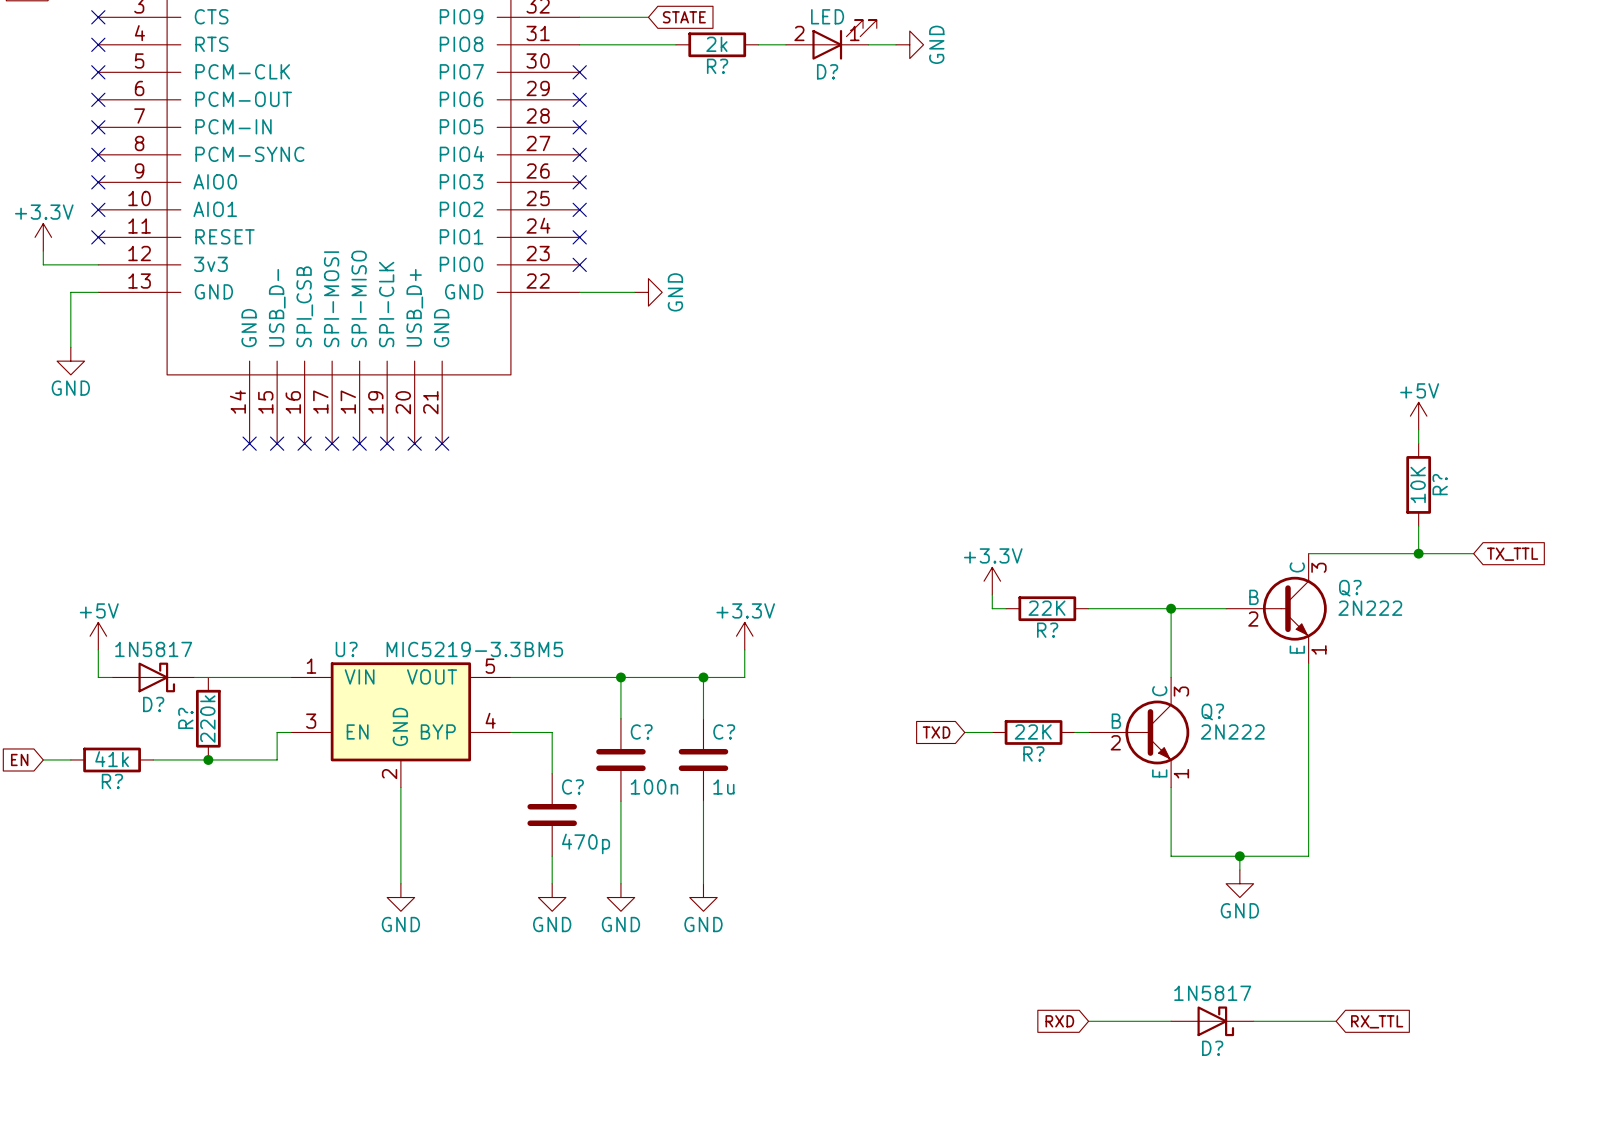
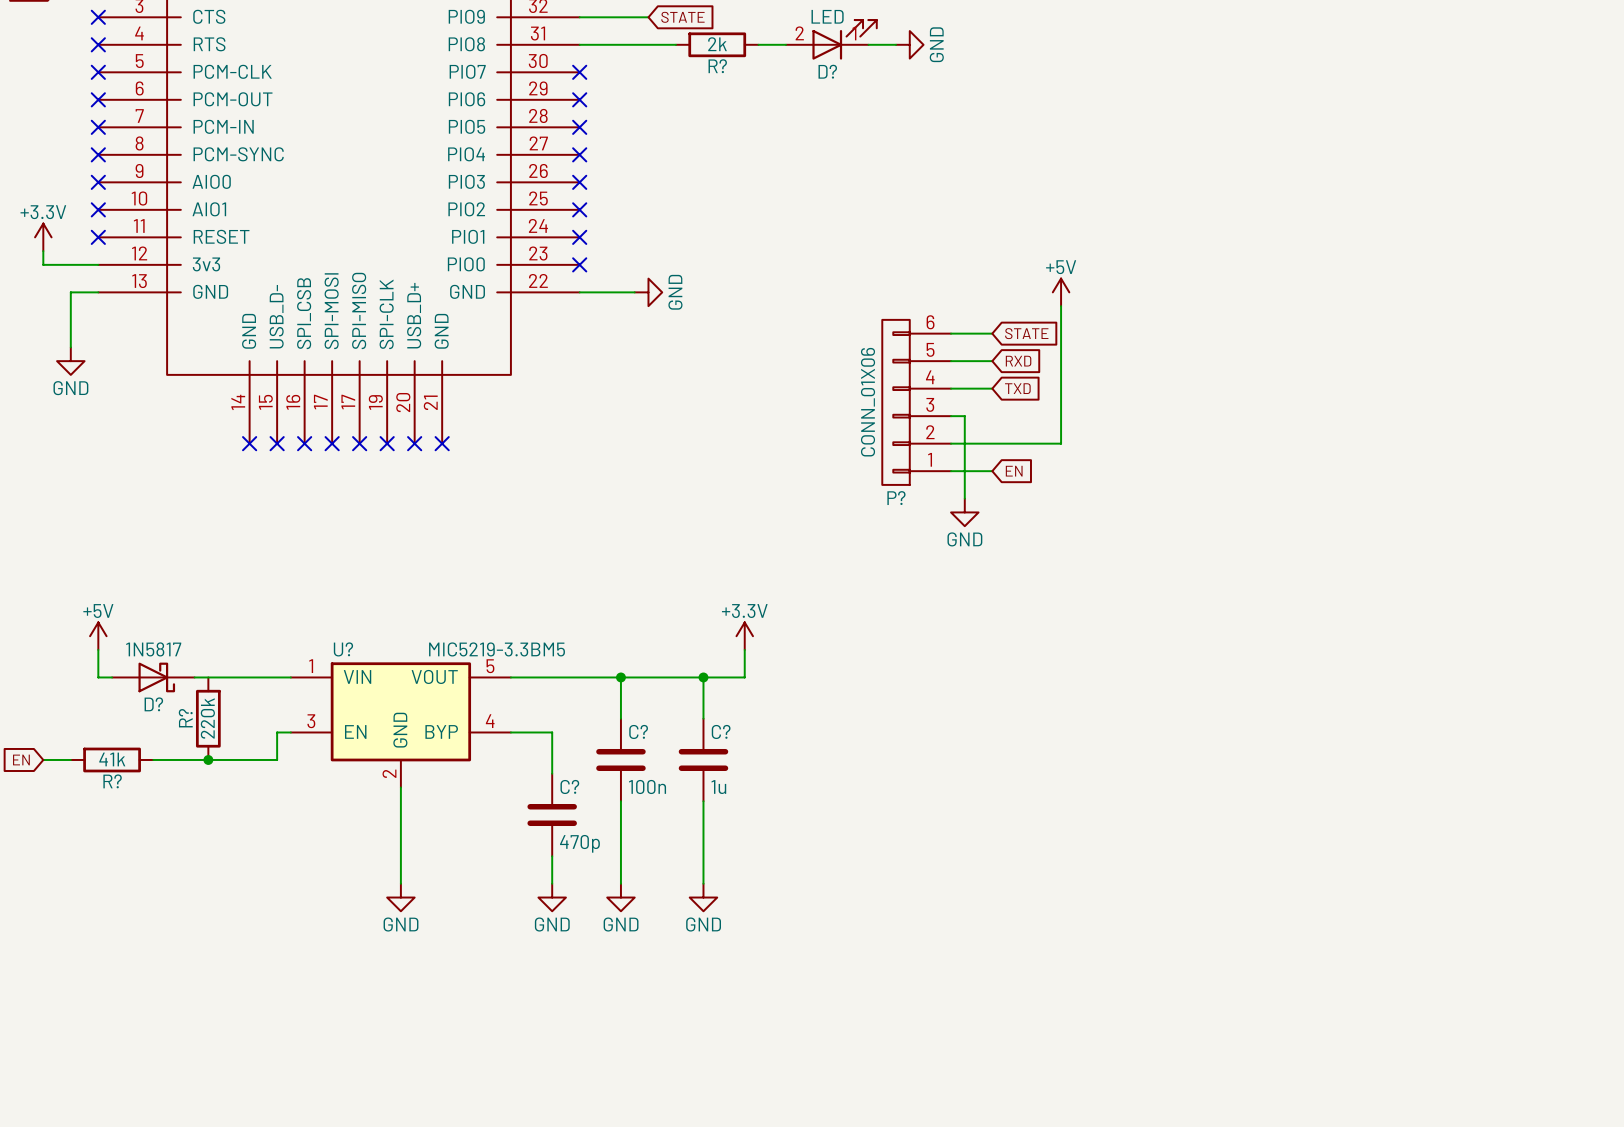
power symbol: none -> +5V (1061, 292)
wire: none -> (1061, 306) (1061, 443) (951, 443)
wire: none -> (951, 333) (992, 333)
global label: none -> STATE (1026, 333)
wire: none -> (951, 361) (992, 361)
global label: none -> RXD (1018, 361)
wire: none -> (951, 388) (992, 388)
global label: none -> TXD (1017, 388)
P?: none -> CONN_01X06 (916, 402)
wire: none -> (951, 416) (964, 416) (964, 498)
power symbol: +5V (1418, 416) -> none
wire: (1418, 429) (1418, 443) -> none
wire: none -> (951, 471) (992, 471)
global label: none -> EN (1014, 471)
R?: 10K (1418, 484) -> none
power symbol: none -> GND (964, 512)
wire: (1418, 526) (1418, 553) -> none
wire: (1308, 553) (1473, 553) -> none
junction: (1418, 553) -> none
global label: TX_TTL (1512, 554) -> none
power symbol: +3.3V (992, 581) -> none
wire: (992, 594) (992, 608) (1006, 608) -> none
R?: 22K (1047, 608) -> none
wire: (1088, 608) (1226, 608) -> none
wire: (1171, 608) (1171, 677) -> none
junction: (1171, 608) -> none
Q?: 2N222 (1276, 608) -> none
wire: (1308, 663) (1308, 856) (1171, 856) (1171, 787) -> none
global label: TXD (936, 732) -> none
wire: (964, 732) (992, 732) -> none
R?: 22K (1033, 732) -> none
wire: (1074, 732) (1088, 732) -> none
Q?: 2N222 (1138, 732) -> none
wire: (1239, 856) (1239, 870) -> none
junction: (1239, 856) -> none
power symbol: GND (1239, 883) -> none
global label: RXD (1059, 1021) -> none
wire: (1088, 1021) (1171, 1021) -> none
D?: 1N5817 (1212, 1021) -> none
wire: (1253, 1021) (1336, 1021) -> none
global label: RX_TTL (1377, 1021) -> none

